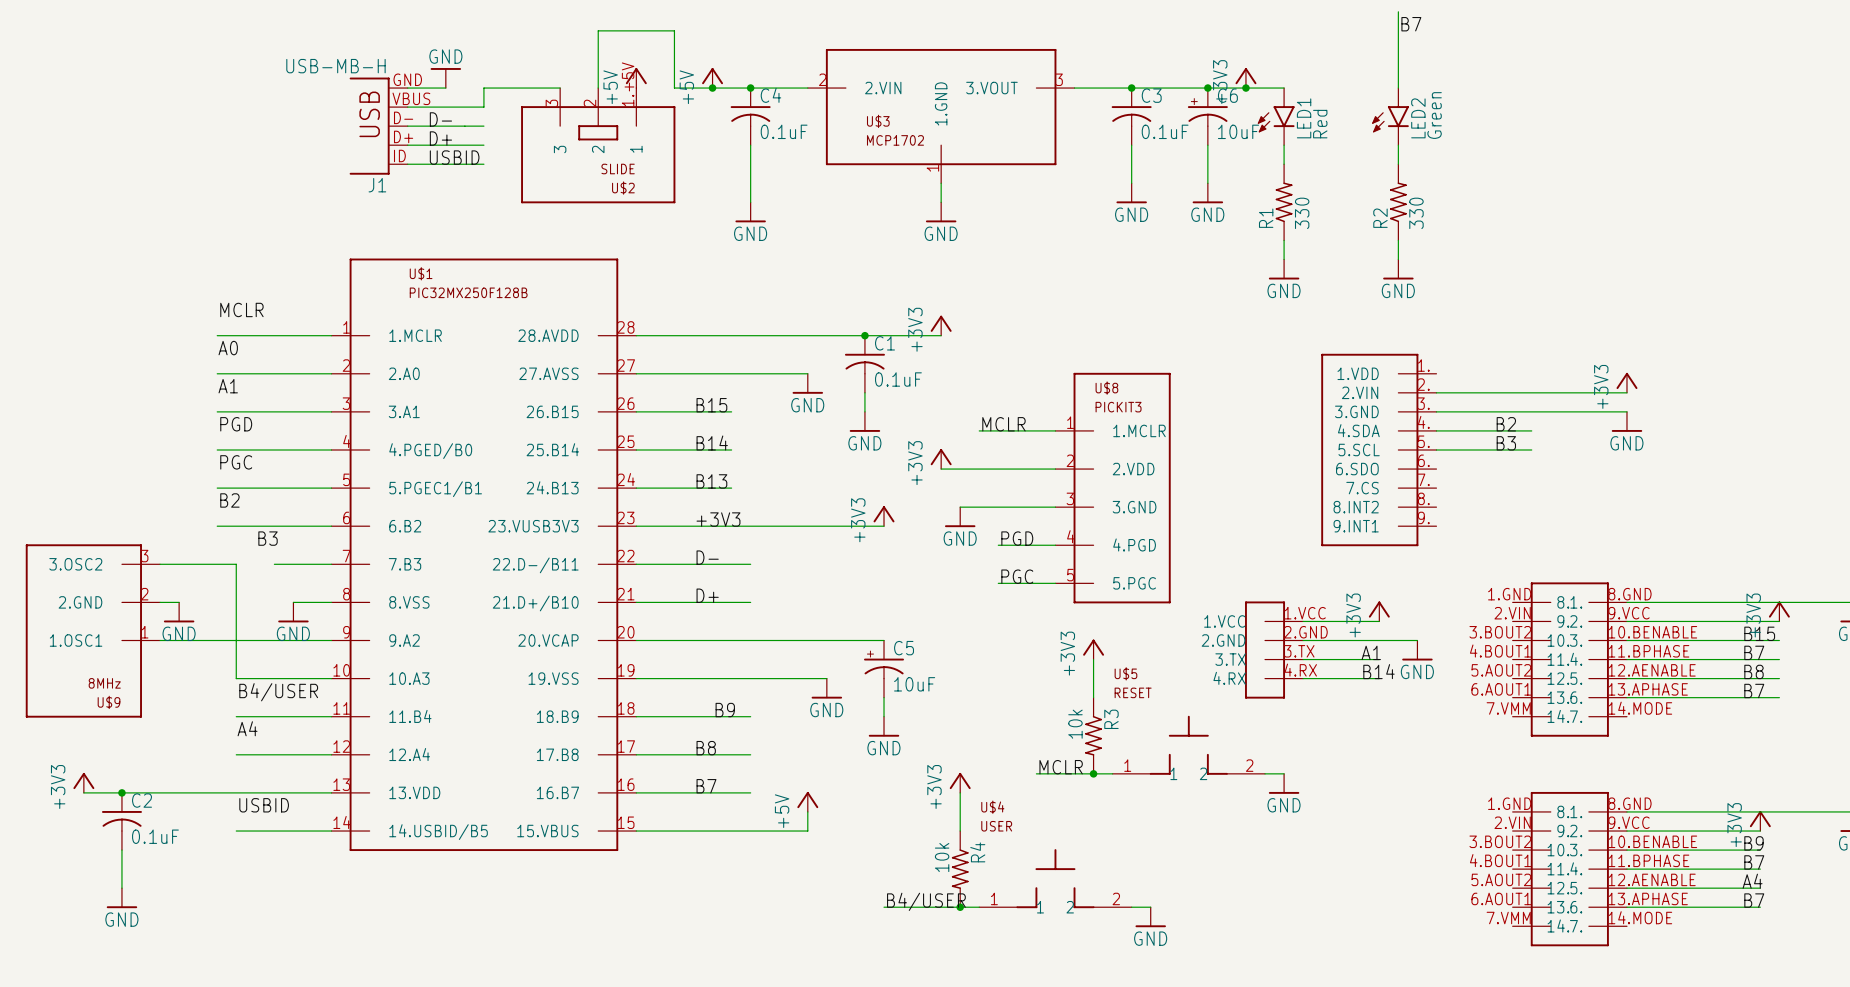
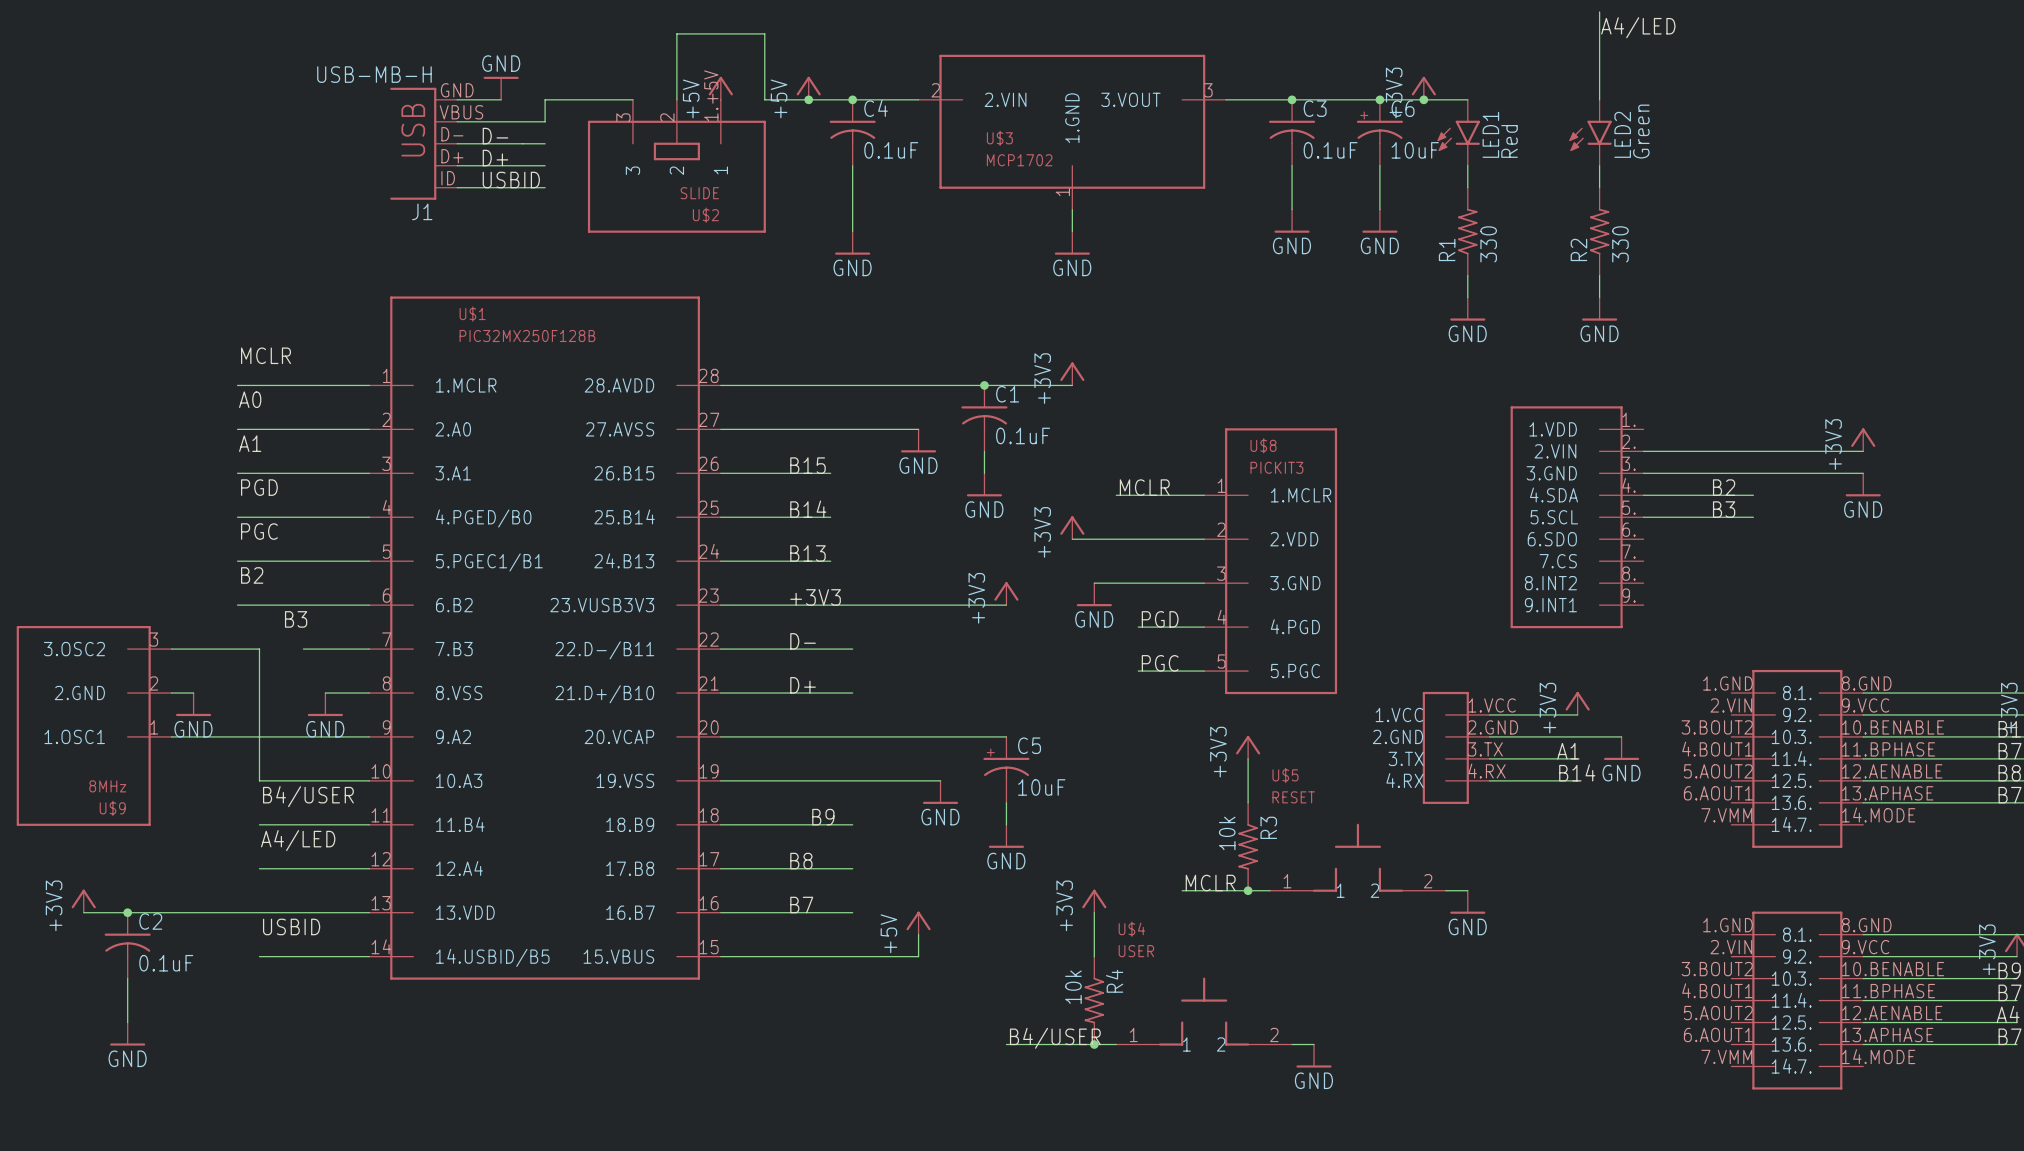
label: B7 (1411, 24) -> A4/LED (1638, 27)
label: A4 (247, 728) -> A4/LED (298, 840)

